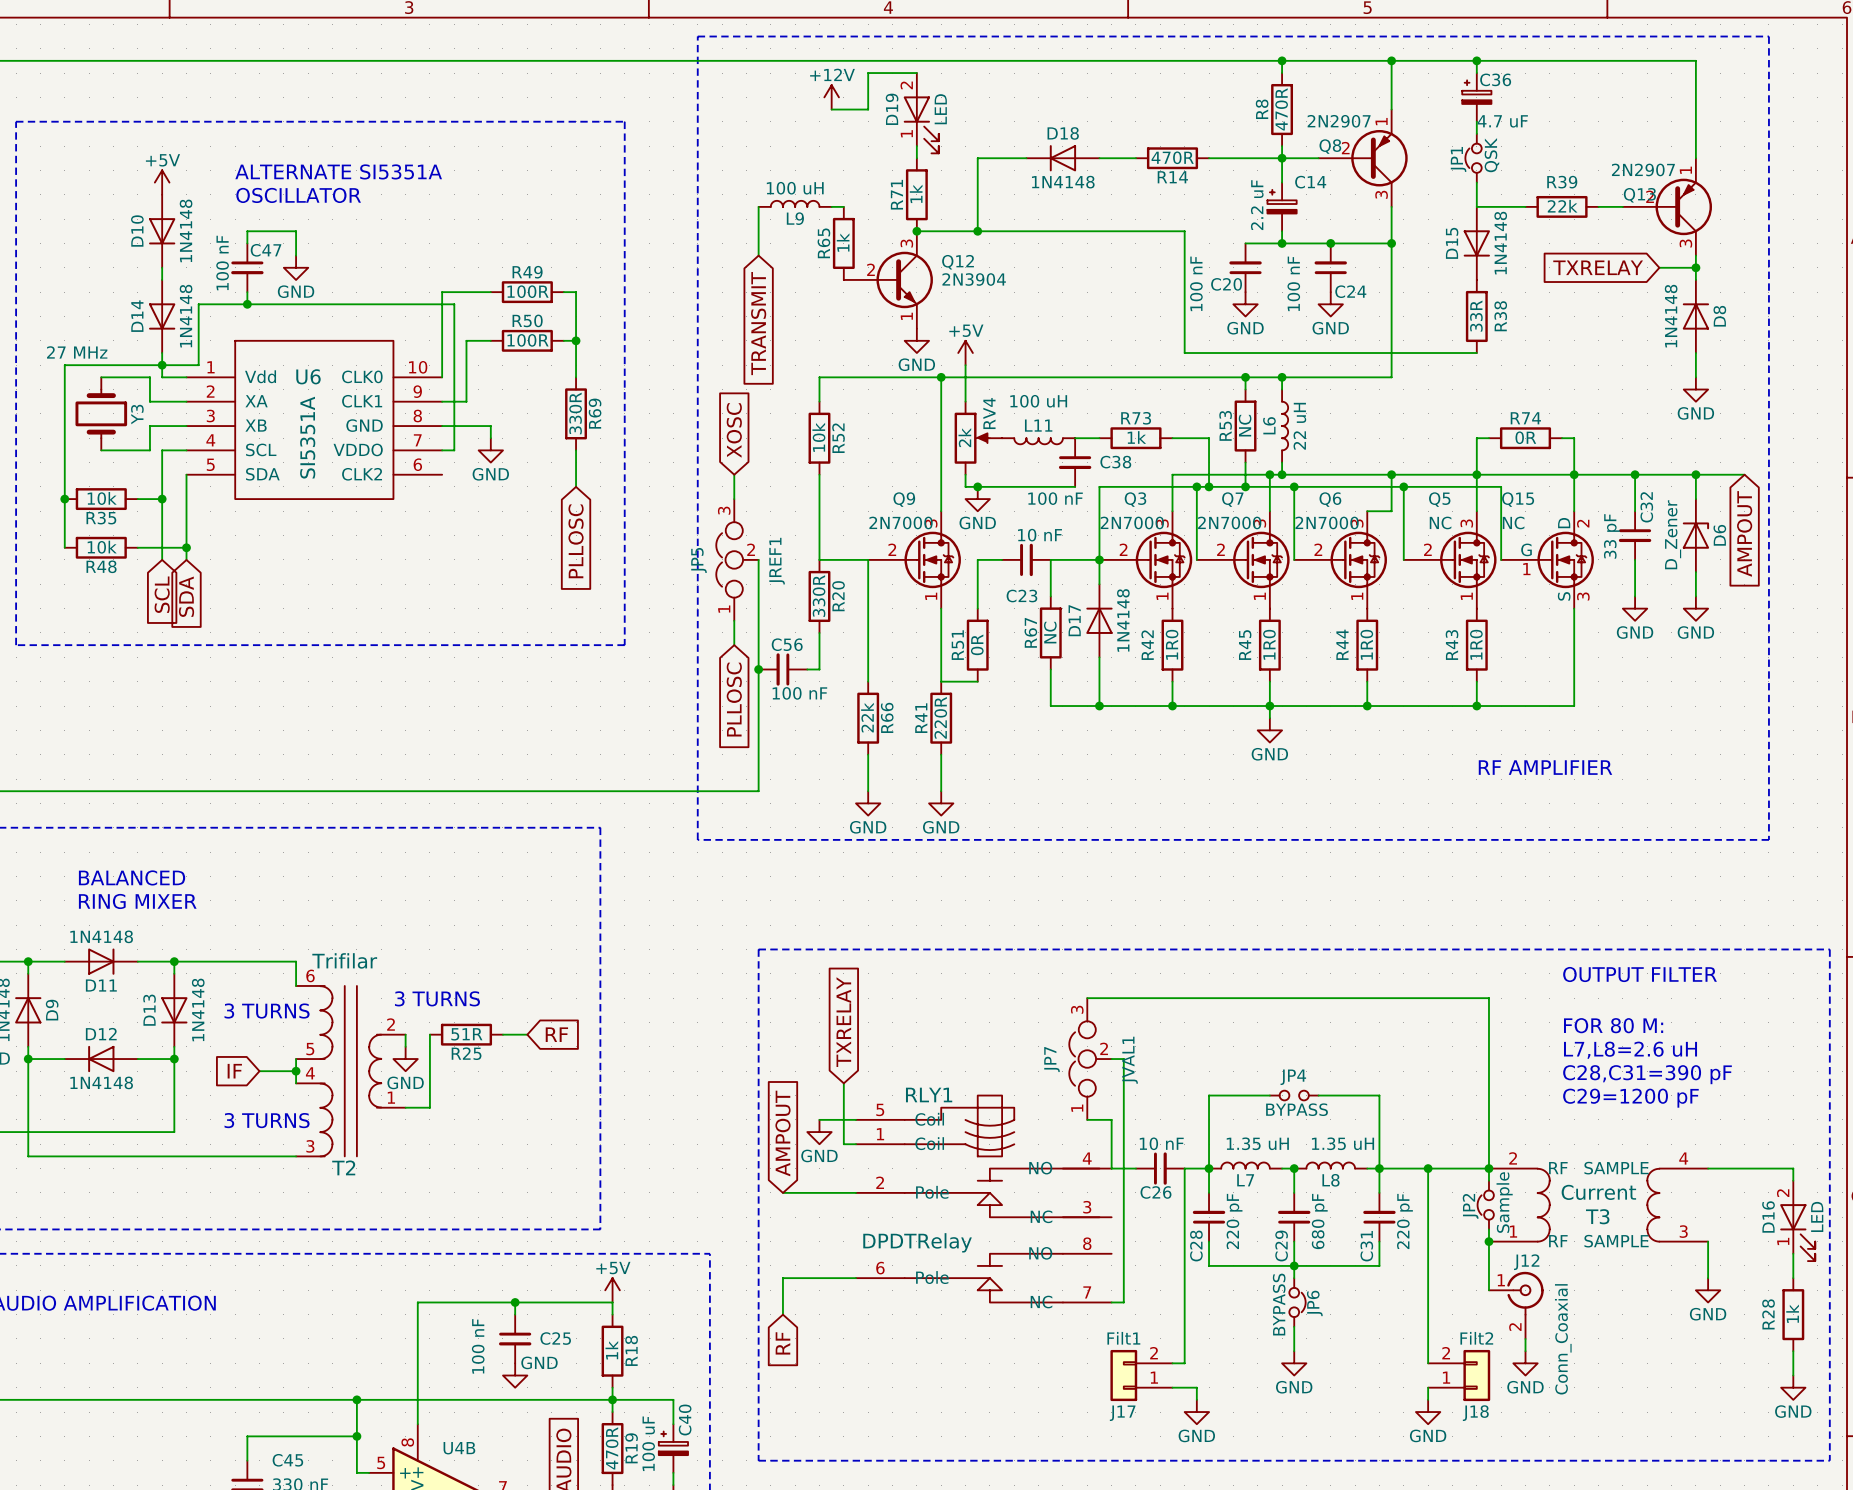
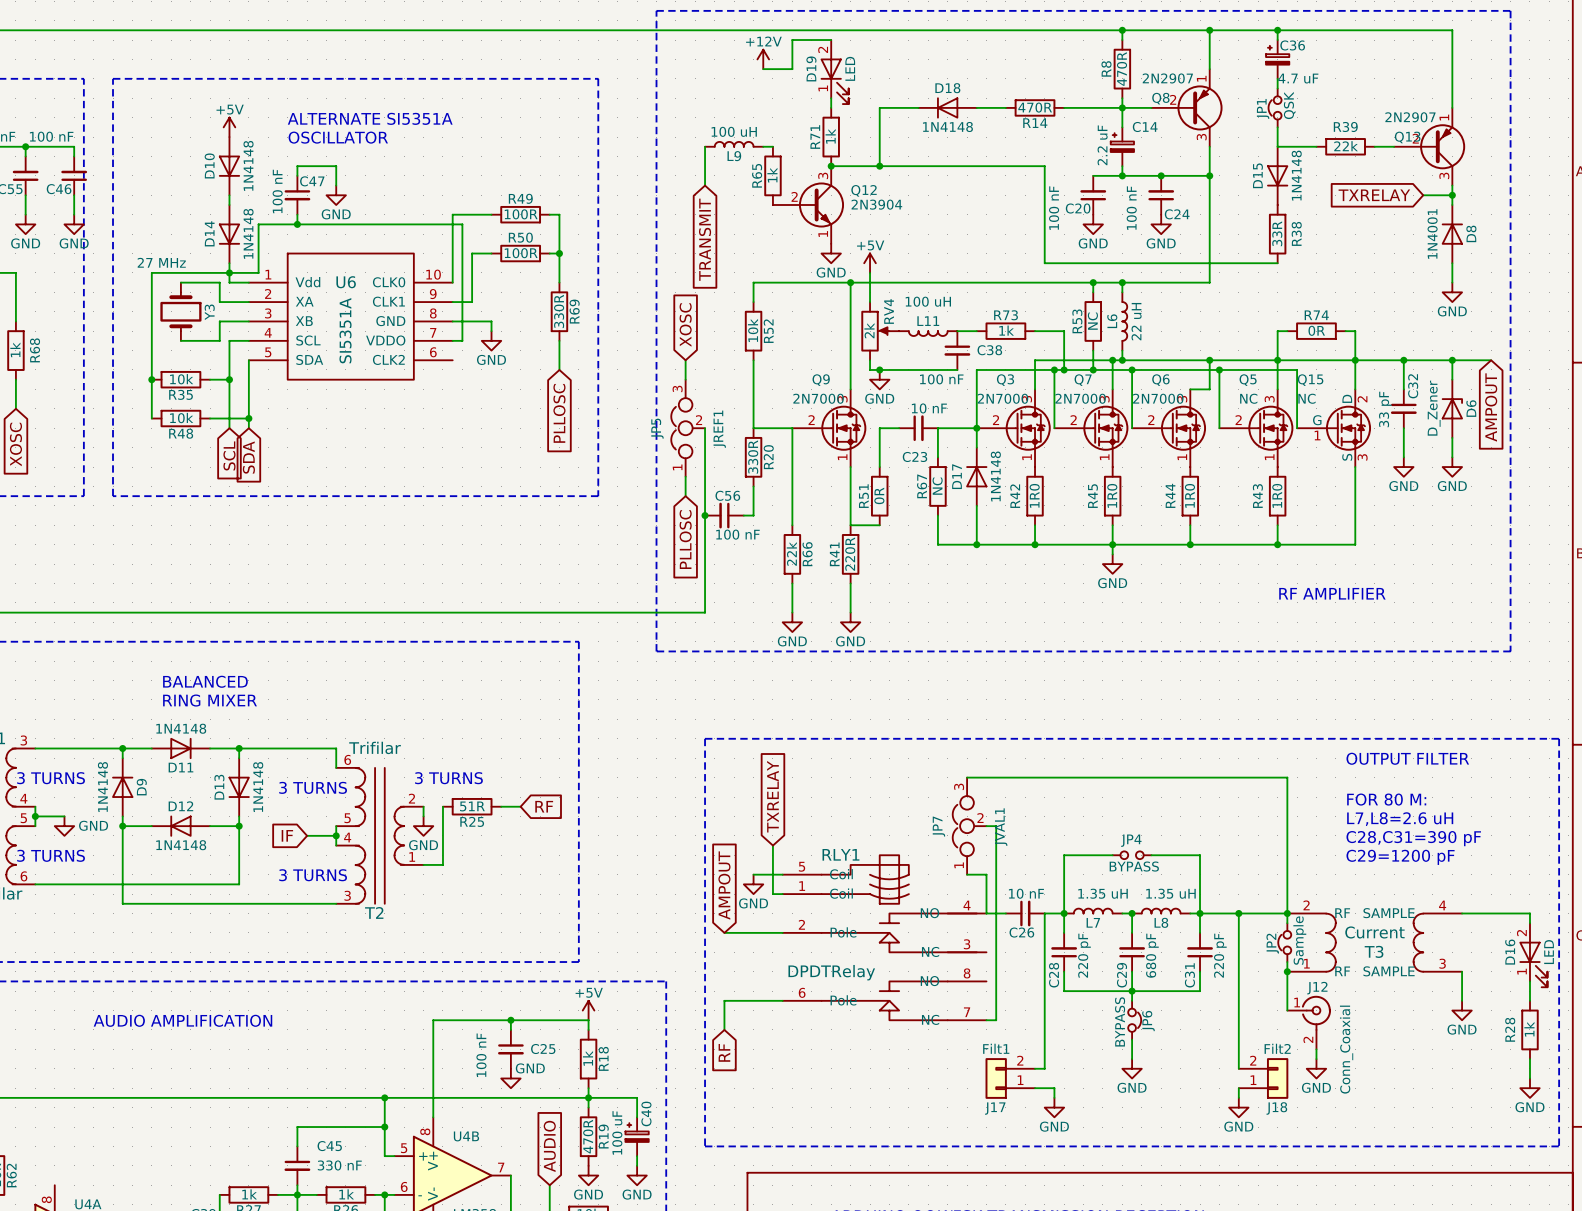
D8 value: 1N4148 (1671, 316) -> 1N4001 (1432, 233)

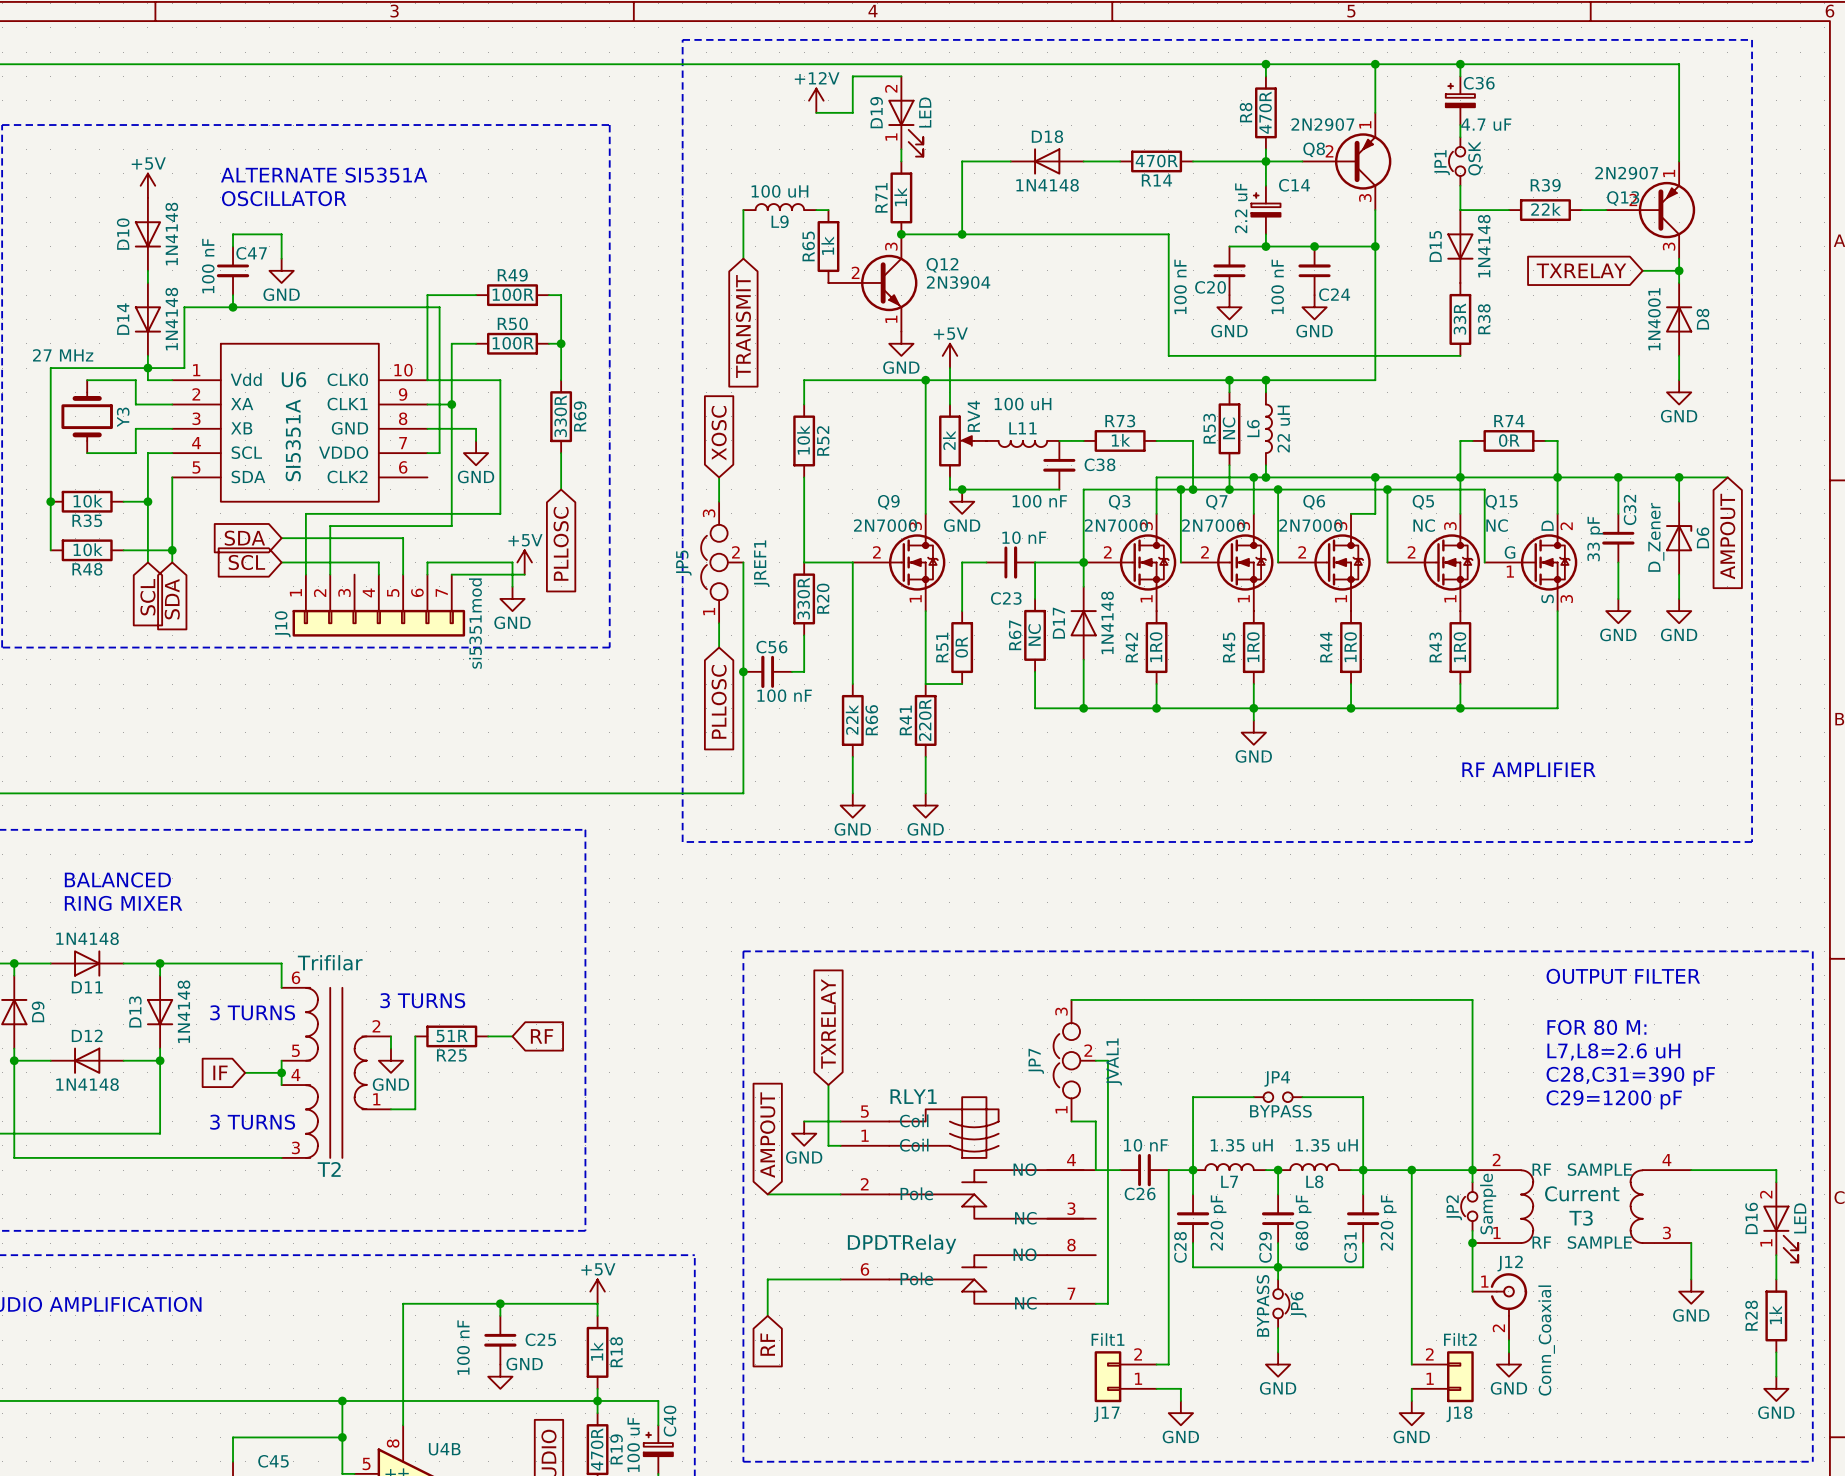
wire: none -> (427, 380) (500, 380) (500, 513) (305, 513) (305, 574)
wire: none -> (451, 404) (451, 526) (330, 526) (330, 574)
junction: none -> (451, 404)
global label: none -> SDA (244, 538)
wire: none -> (281, 538) (403, 538) (403, 574)
global label: none -> SCL (246, 562)
wire: none -> (281, 562) (378, 562) (378, 574)
power symbol: none -> +5V (524, 562)
wire: none -> (427, 574) (427, 562) (512, 562) (512, 586)
wire: none -> (451, 574) (524, 574)
power symbol: none -> GND (512, 598)
J10: none -> si5351mod (378, 605)

